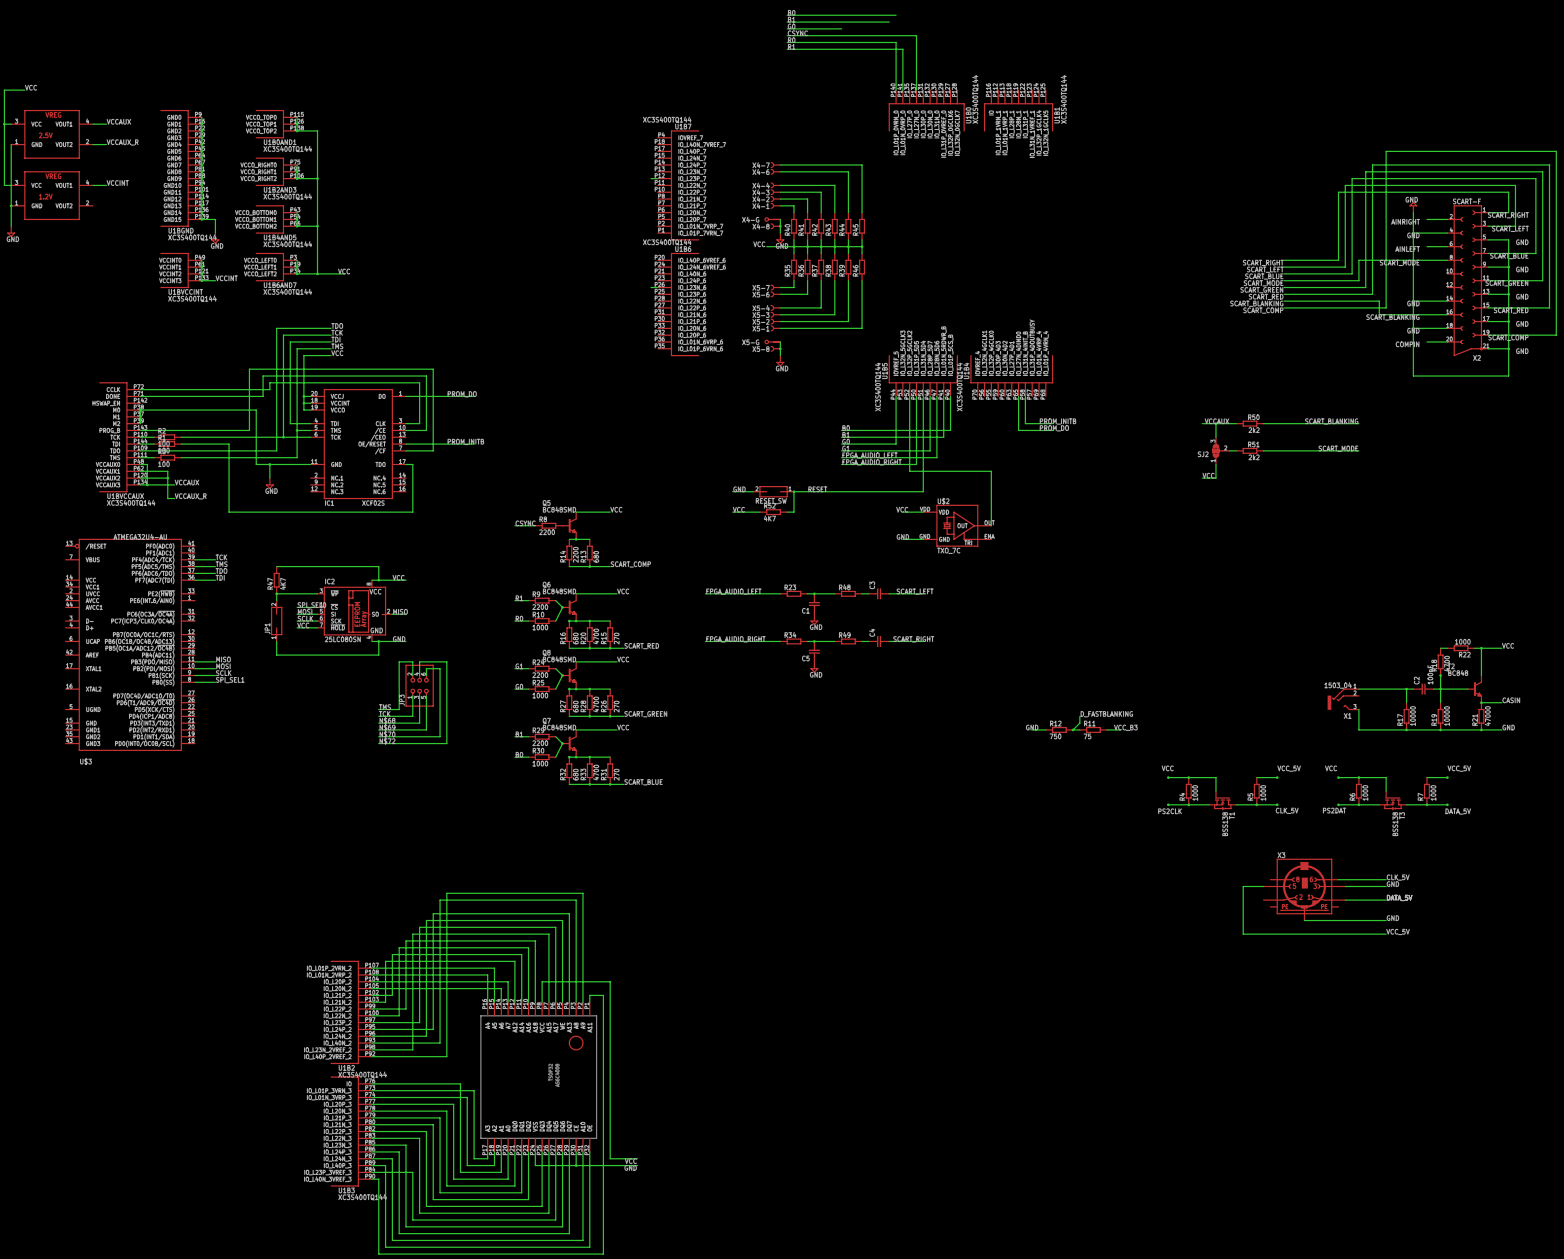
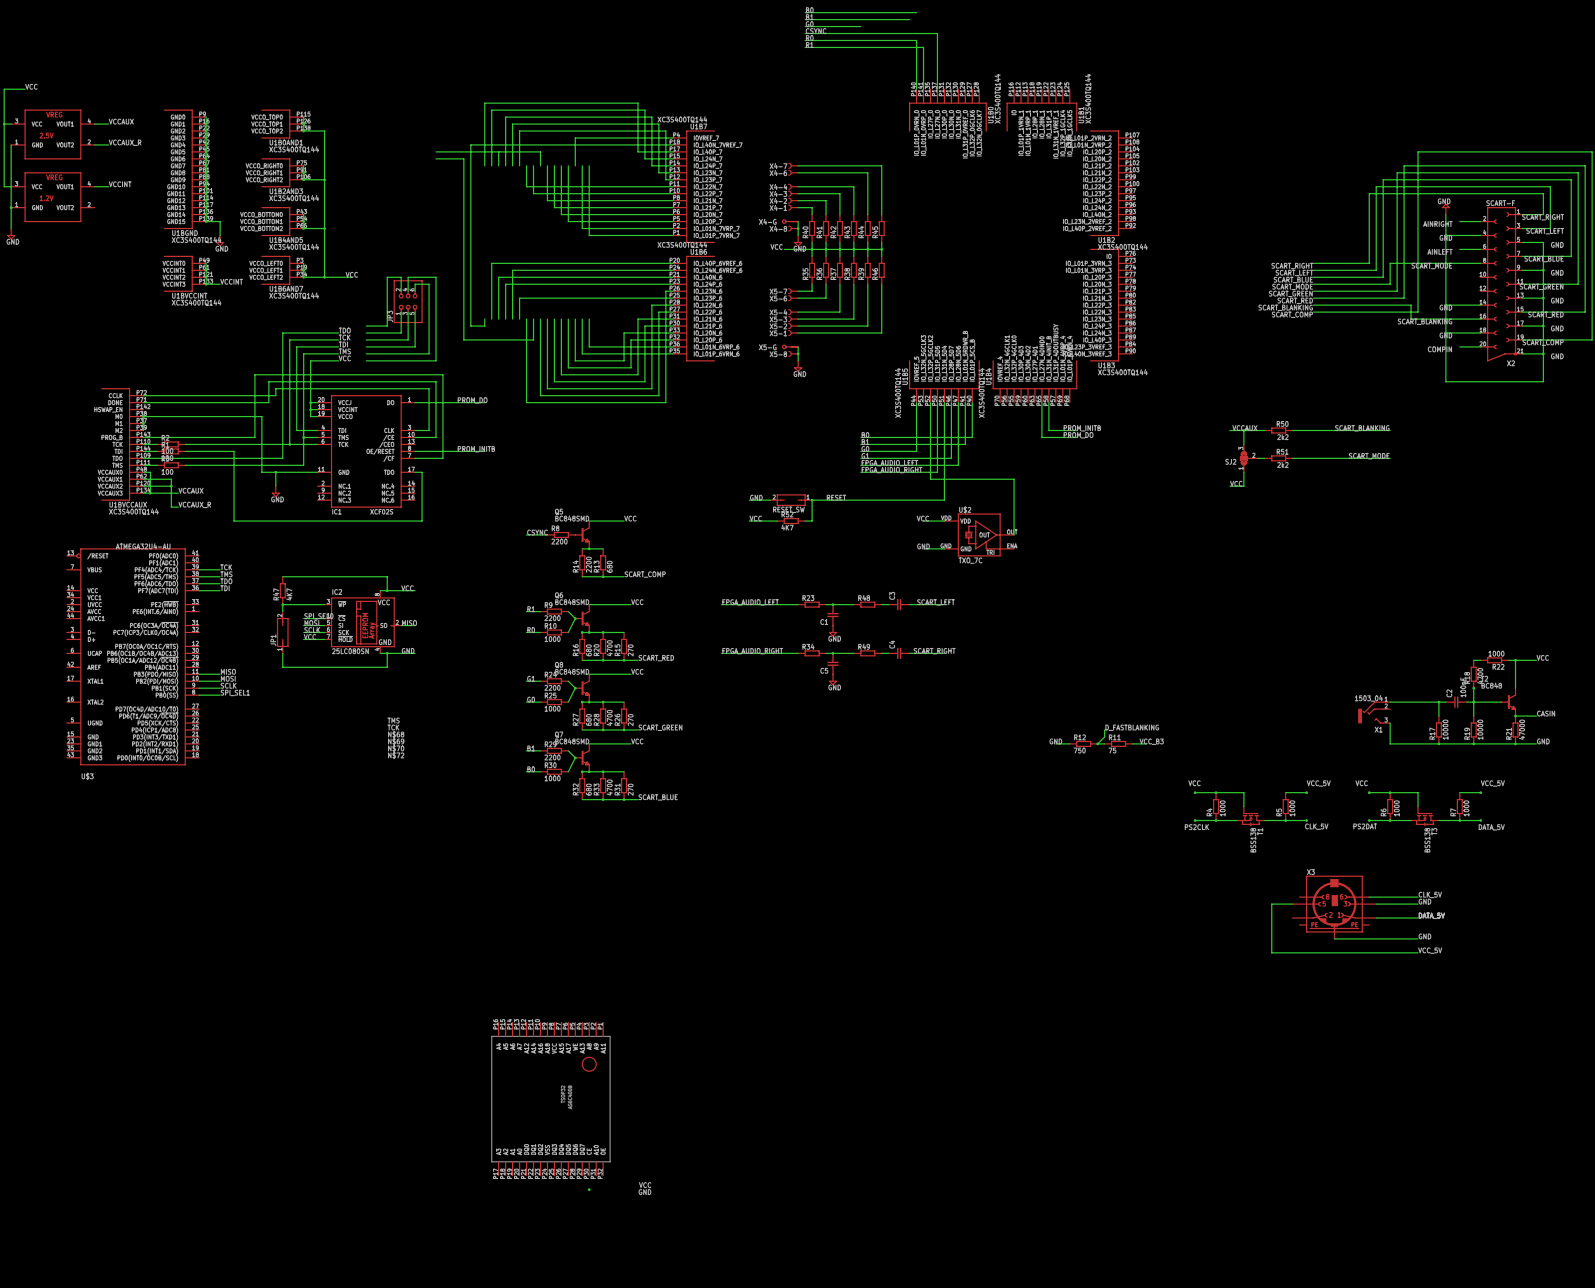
wire: none -> (672, 137) (575, 137) (575, 165)
wire: none -> (672, 144) (470, 144) (470, 326) (484, 326) (484, 319)
wire: none -> (436, 151) (540, 151) (540, 165)
wire: none -> (498, 151) (498, 165)
wire: none -> (672, 151) (637, 151) (637, 103) (484, 103) (484, 165)
wire: none -> (436, 158) (463, 158) (463, 339) (533, 339) (533, 319)
wire: none -> (672, 158) (644, 158) (644, 110) (491, 110) (491, 165)
wire: none -> (505, 165) (505, 117) (651, 117) (651, 165) (672, 165)
wire: none -> (512, 165) (512, 124) (658, 124) (658, 172) (672, 172)
wire: none -> (519, 165) (519, 131) (665, 131) (665, 179)
wire: none -> (526, 165) (526, 186) (672, 186)
wire: none -> (533, 165) (533, 193) (672, 193)
wire: none -> (547, 165) (547, 200) (672, 200)
wire: none -> (554, 165) (554, 207) (672, 207)
wire: none -> (561, 165) (561, 214) (672, 214)
wire: none -> (568, 165) (568, 221) (672, 221)
wire: none -> (582, 165) (582, 228) (672, 228)
wire: none -> (589, 165) (589, 235) (672, 235)
wire: none -> (672, 263) (491, 263) (491, 319)
wire: none -> (672, 270) (512, 270) (512, 319)
wire: none -> (672, 277) (498, 277) (498, 319)
wire: none -> (672, 284) (505, 284) (505, 319)
wire: none -> (401, 291) (401, 277) (387, 277) (387, 326) (366, 326)
wire: none -> (408, 291) (408, 277) (436, 277) (436, 360) (366, 360)
wire: none -> (415, 291) (415, 284) (429, 284) (429, 353) (366, 353)
wire: none -> (665, 291) (665, 402) (526, 402) (526, 319)
wire: none -> (672, 298) (519, 298) (519, 319)
wire: none -> (672, 305) (651, 305) (651, 388) (547, 388) (547, 319)
wire: none -> (401, 312) (401, 332) (366, 332)
wire: none -> (408, 312) (408, 339) (366, 339)
wire: none -> (415, 312) (415, 346) (366, 346)
wire: none -> (672, 312) (658, 312) (658, 395) (540, 395) (540, 319)
wire: none -> (554, 319) (554, 381) (644, 381) (644, 326) (672, 326)
wire: none -> (561, 319) (561, 374) (637, 374) (637, 319) (672, 319)
wire: none -> (568, 319) (568, 367) (631, 367) (631, 339) (672, 339)
wire: none -> (575, 319) (575, 360) (624, 360) (624, 332) (672, 332)
wire: none -> (582, 319) (582, 353) (672, 353)
wire: none -> (589, 319) (589, 346) (672, 346)
wire: (412, 675) (412, 661) (399, 661) (399, 709) (378, 709) -> none
wire: (419, 675) (419, 661) (446, 661) (446, 743) (378, 743) -> none
wire: (426, 675) (426, 668) (440, 668) (440, 736) (378, 736) -> none
part position: (419, 685) -> (408, 301)
wire: (412, 695) (412, 716) (378, 716) -> none
wire: (419, 695) (419, 723) (378, 723) -> none
wire: (426, 695) (426, 729) (378, 729) -> none
wire: (371, 968) (494, 968) (494, 1002) -> none
wire: (371, 974) (487, 974) (487, 1002) -> none
wire: (371, 981) (508, 981) (508, 1002) -> none
wire: (371, 988) (501, 988) (501, 1002) -> none
wire: (371, 995) (392, 995) (392, 954) (521, 954) (521, 1002) -> none
wire: (371, 1002) (385, 1002) (385, 961) (514, 961) (514, 1002) -> none
wire: (528, 1002) (528, 947) (399, 947) (399, 1015) (371, 1015) -> none
wire: (535, 1002) (535, 940) (406, 940) (406, 1009) (371, 1009) -> none
wire: (542, 1002) (542, 981) (610, 981) (610, 1158) (637, 1158) -> none
wire: (548, 1002) (548, 934) (412, 934) (412, 1049) (371, 1049) -> none
wire: (555, 1002) (555, 927) (419, 927) (419, 1022) (371, 1022) -> none
wire: (562, 1002) (562, 920) (426, 920) (426, 1036) (371, 1036) -> none
wire: (569, 1002) (569, 913) (433, 913) (433, 1029) (371, 1029) -> none
wire: (576, 1002) (576, 900) (440, 900) (440, 1043) (371, 1043) -> none
wire: (582, 1002) (582, 893) (446, 893) (446, 1056) (371, 1056) -> none
wire: (589, 1002) (589, 995) (603, 995) (603, 1254) (378, 1254) (378, 1179) (371, 1179) -> none
part position: (351, 1012) -> (1111, 183)
wire: (371, 1083) (460, 1083) (460, 1172) (501, 1172) (501, 1151) -> none
wire: (371, 1090) (474, 1090) (474, 1158) (487, 1158) (487, 1151) -> none
wire: (371, 1097) (467, 1097) (467, 1165) (494, 1165) (494, 1151) -> none
wire: (371, 1104) (453, 1104) (453, 1179) (508, 1179) (508, 1151) -> none
wire: (371, 1111) (446, 1111) (446, 1185) (514, 1185) (514, 1151) -> none
wire: (371, 1117) (440, 1117) (440, 1192) (521, 1192) (521, 1151) -> none
wire: (371, 1124) (433, 1124) (433, 1199) (528, 1199) (528, 1151) -> none
part position: (351, 1131) -> (1111, 305)
wire: (371, 1131) (426, 1131) (426, 1206) (542, 1206) (542, 1151) -> none
wire: (371, 1138) (419, 1138) (419, 1213) (548, 1213) (548, 1151) -> none
wire: (371, 1145) (406, 1145) (406, 1226) (562, 1226) (562, 1151) -> none
wire: (371, 1151) (399, 1151) (399, 1233) (569, 1233) (569, 1151) -> none
wire: (535, 1151) (535, 1165) (637, 1165) -> none
wire: (555, 1151) (555, 1220) (412, 1220) (412, 1172) (371, 1172) -> none
wire: (576, 1151) (576, 1165) -> none
wire: (582, 1151) (582, 1240) (392, 1240) (392, 1158) (371, 1158) -> none
wire: (589, 1151) (589, 1247) (385, 1247) (385, 1165) (371, 1165) -> none

